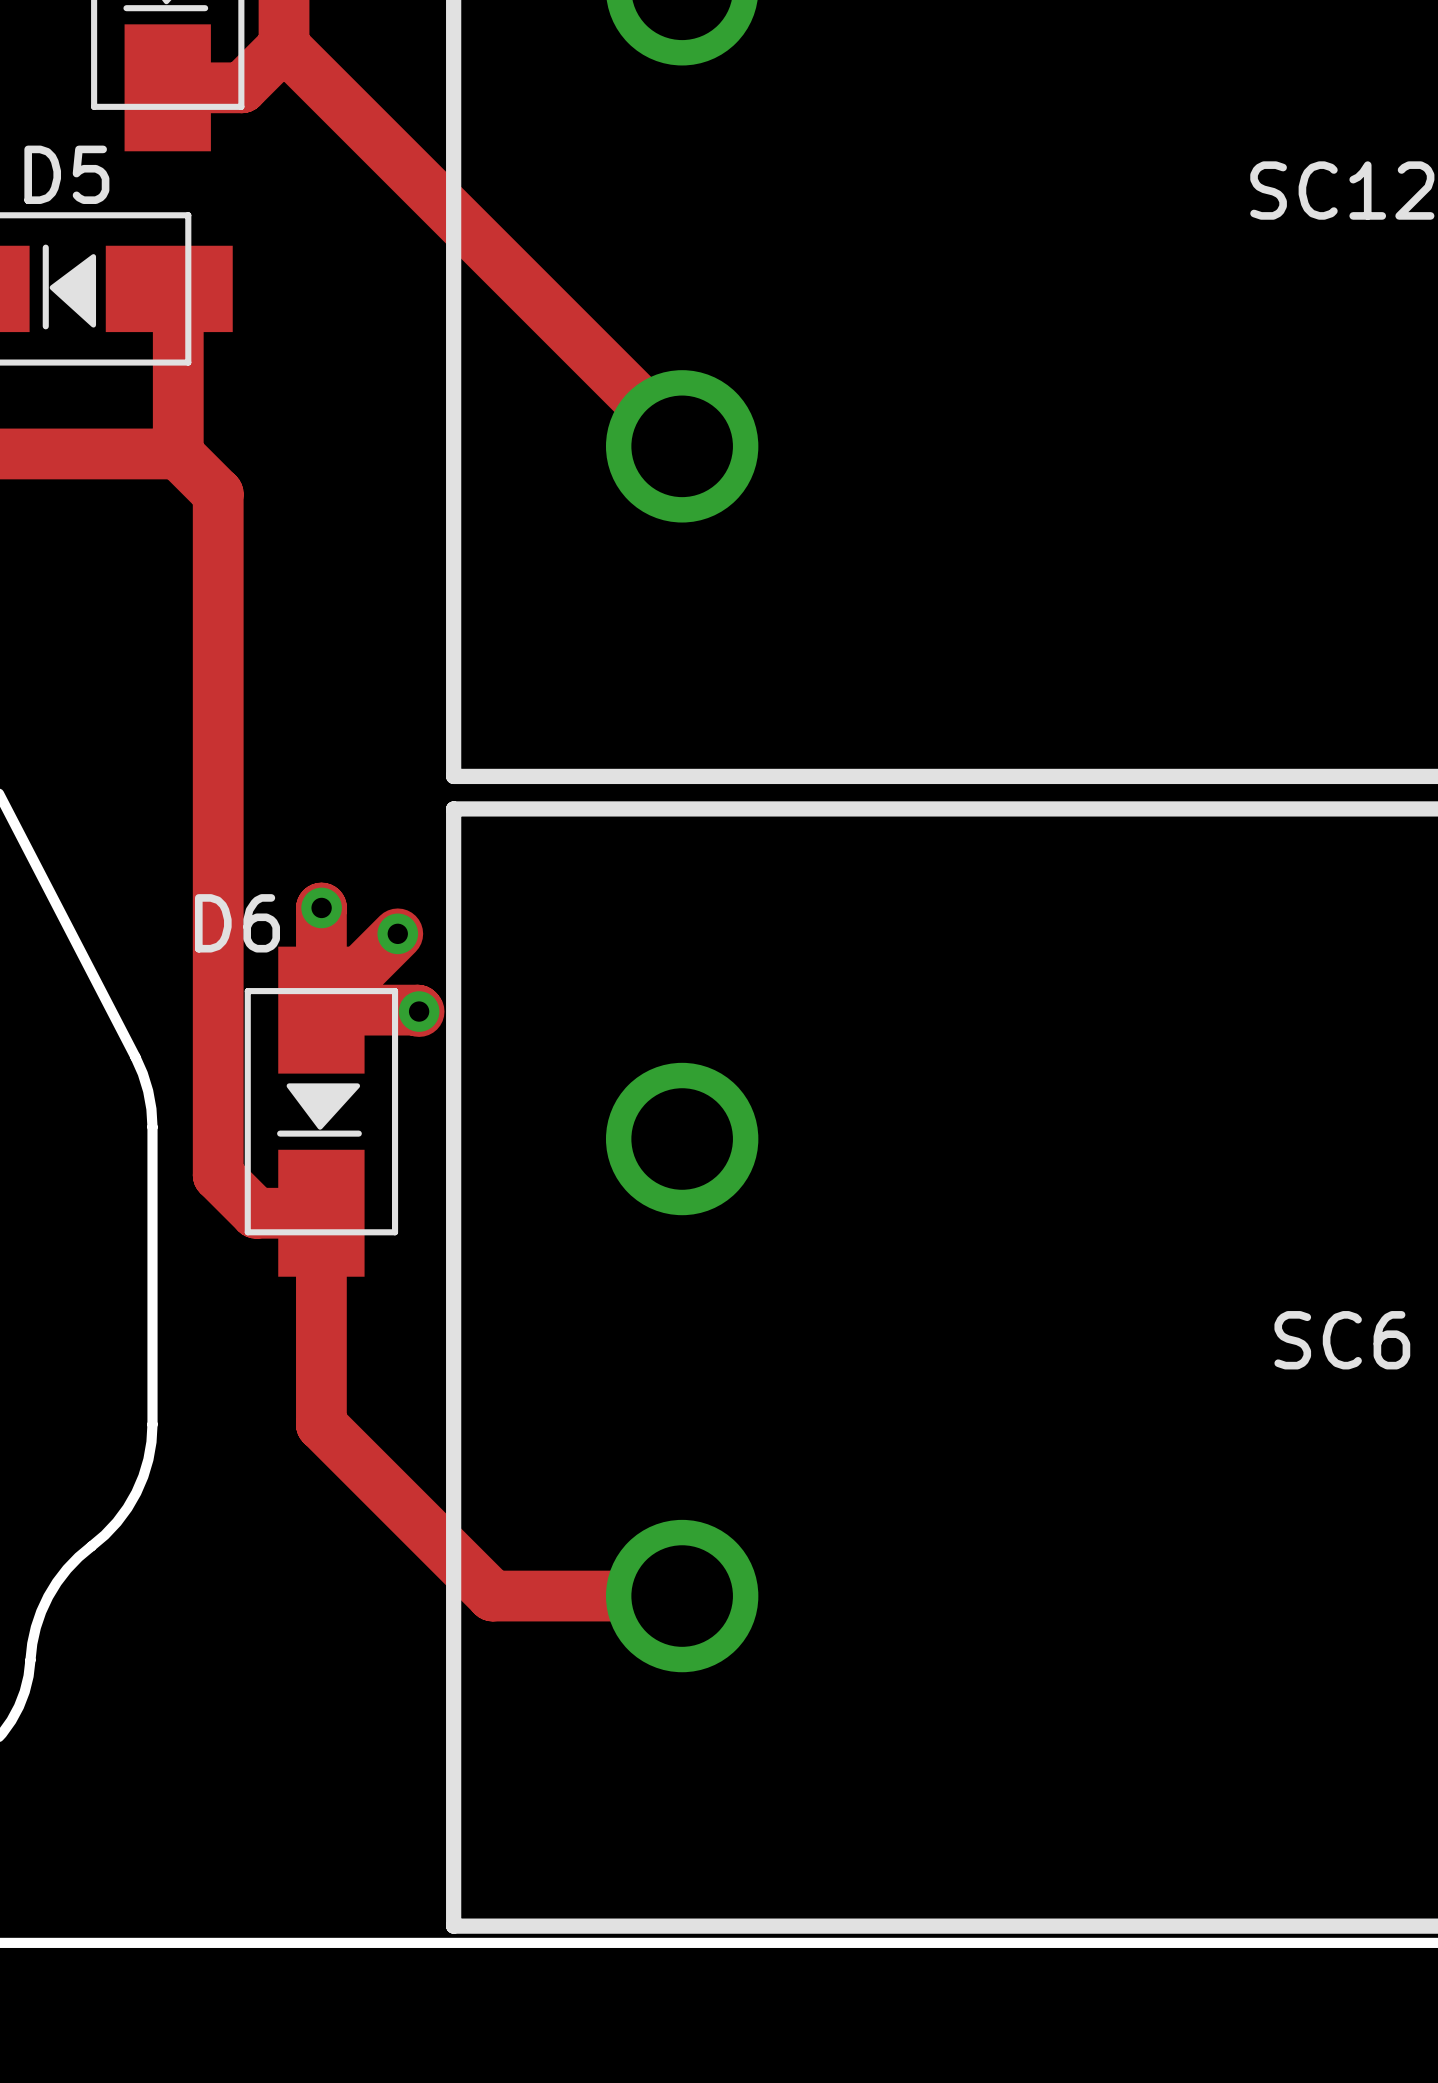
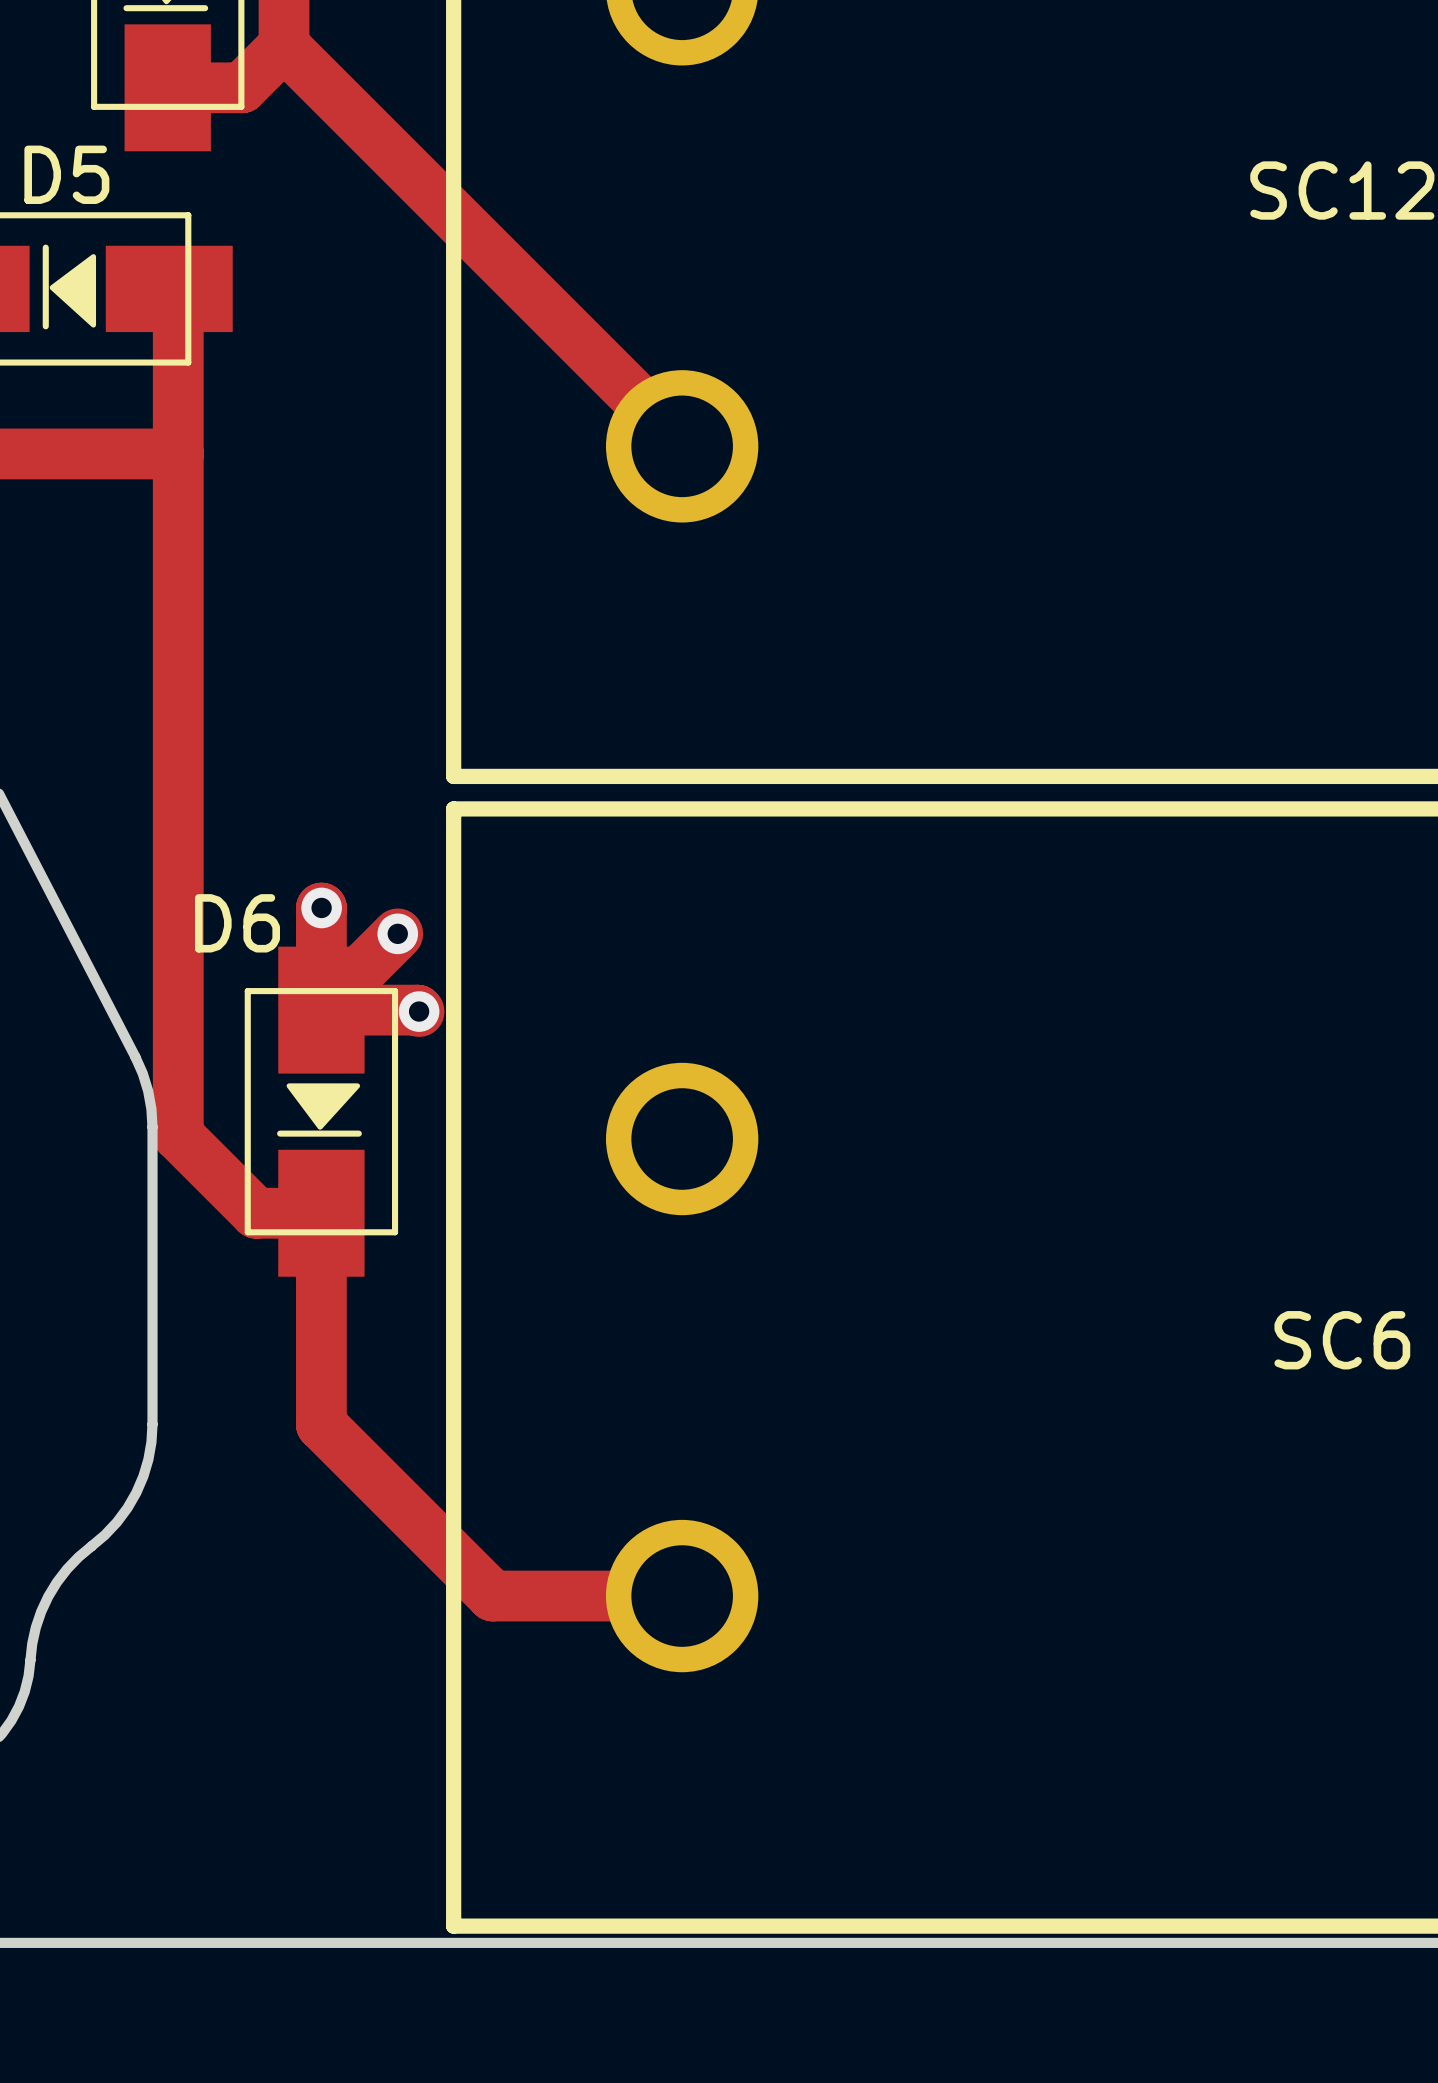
track: (178, 453) (218, 493) (218, 1175) -> (178, 453) (178, 1135) (218, 1175)

